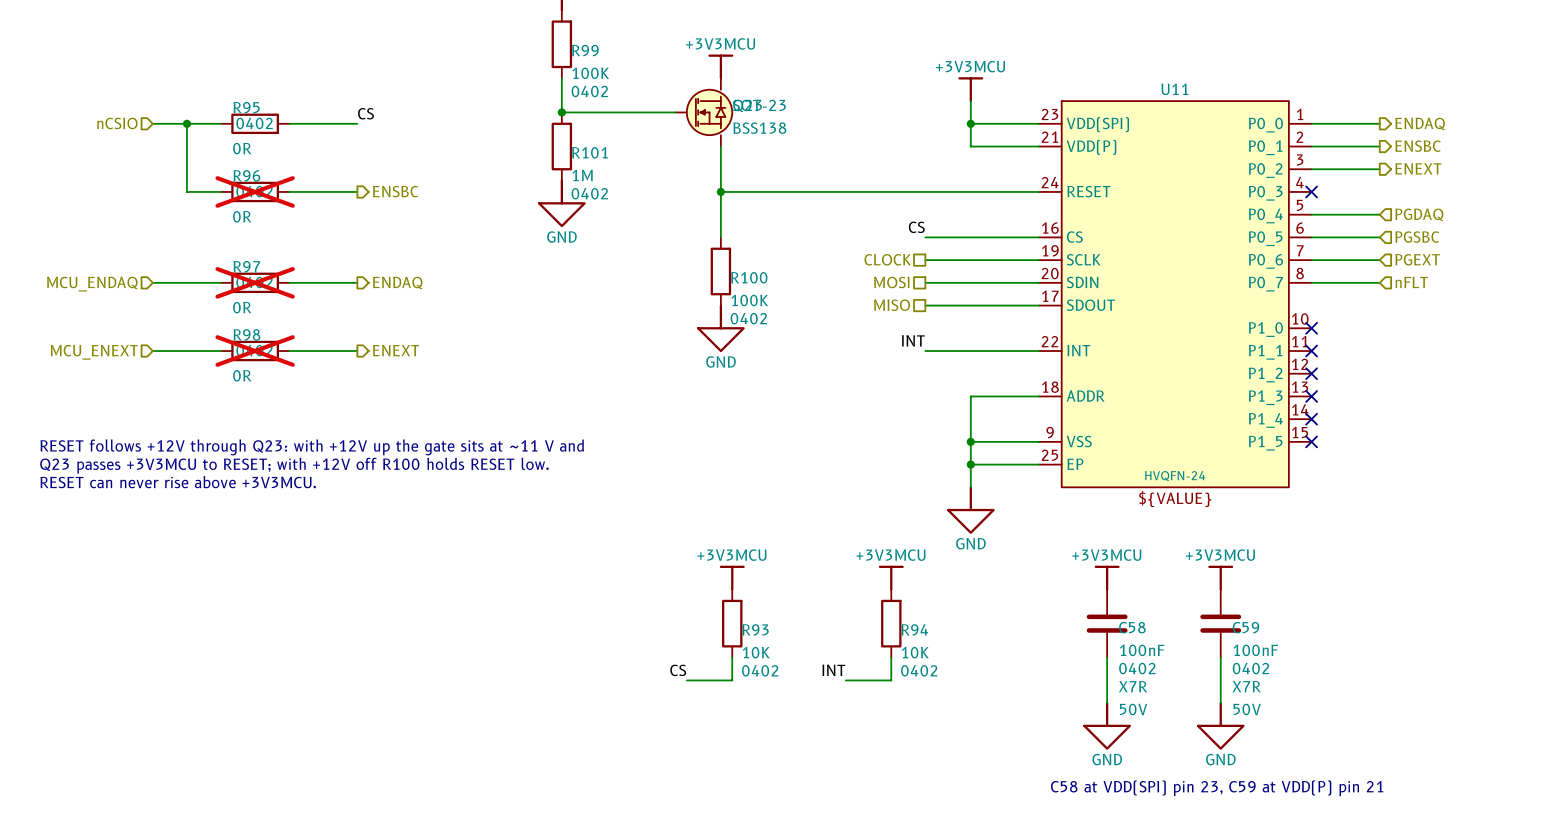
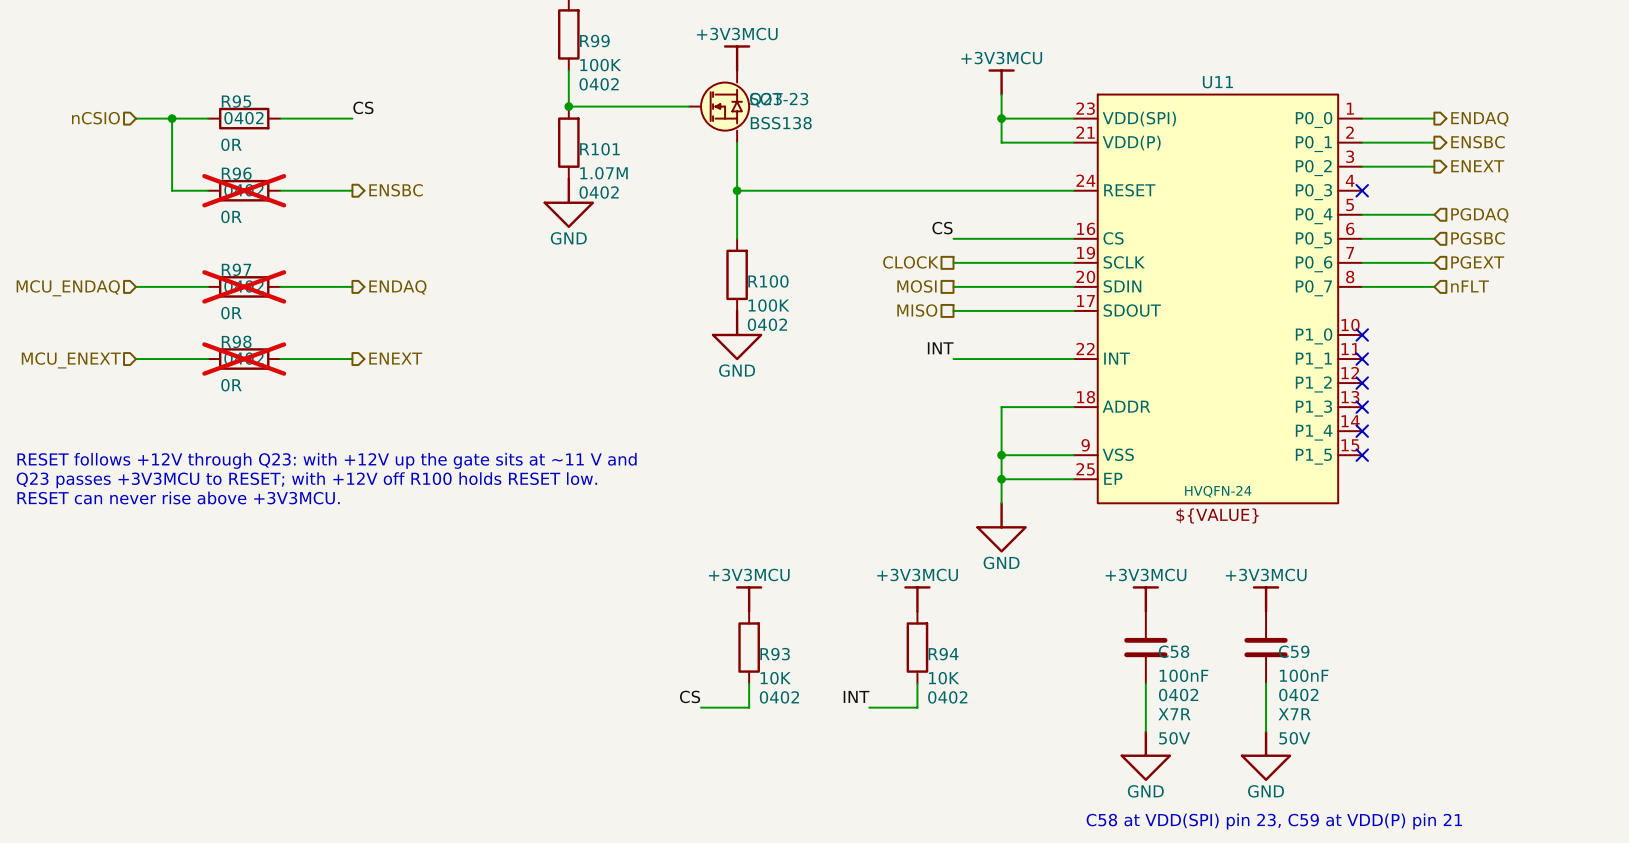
R101 value: 1M (582, 175) -> 1.07M (604, 173)

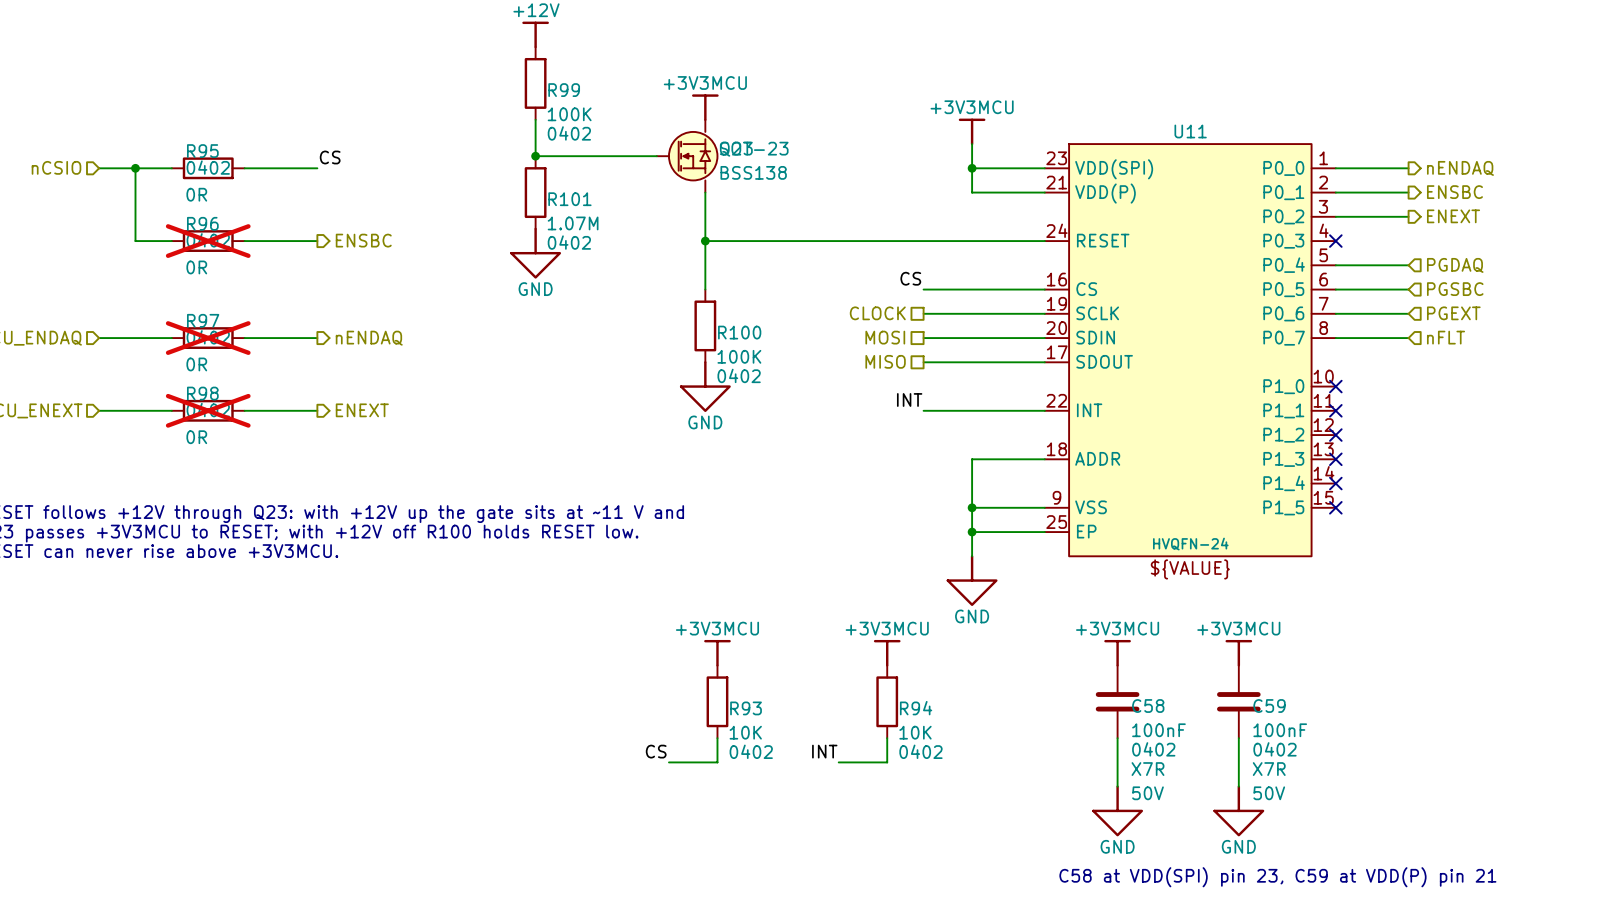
hierarchical label: ENDAQ (1479, 119) -> nENDAQ (1460, 168)
hierarchical label: ENDAQ (397, 287) -> nENDAQ (369, 338)

